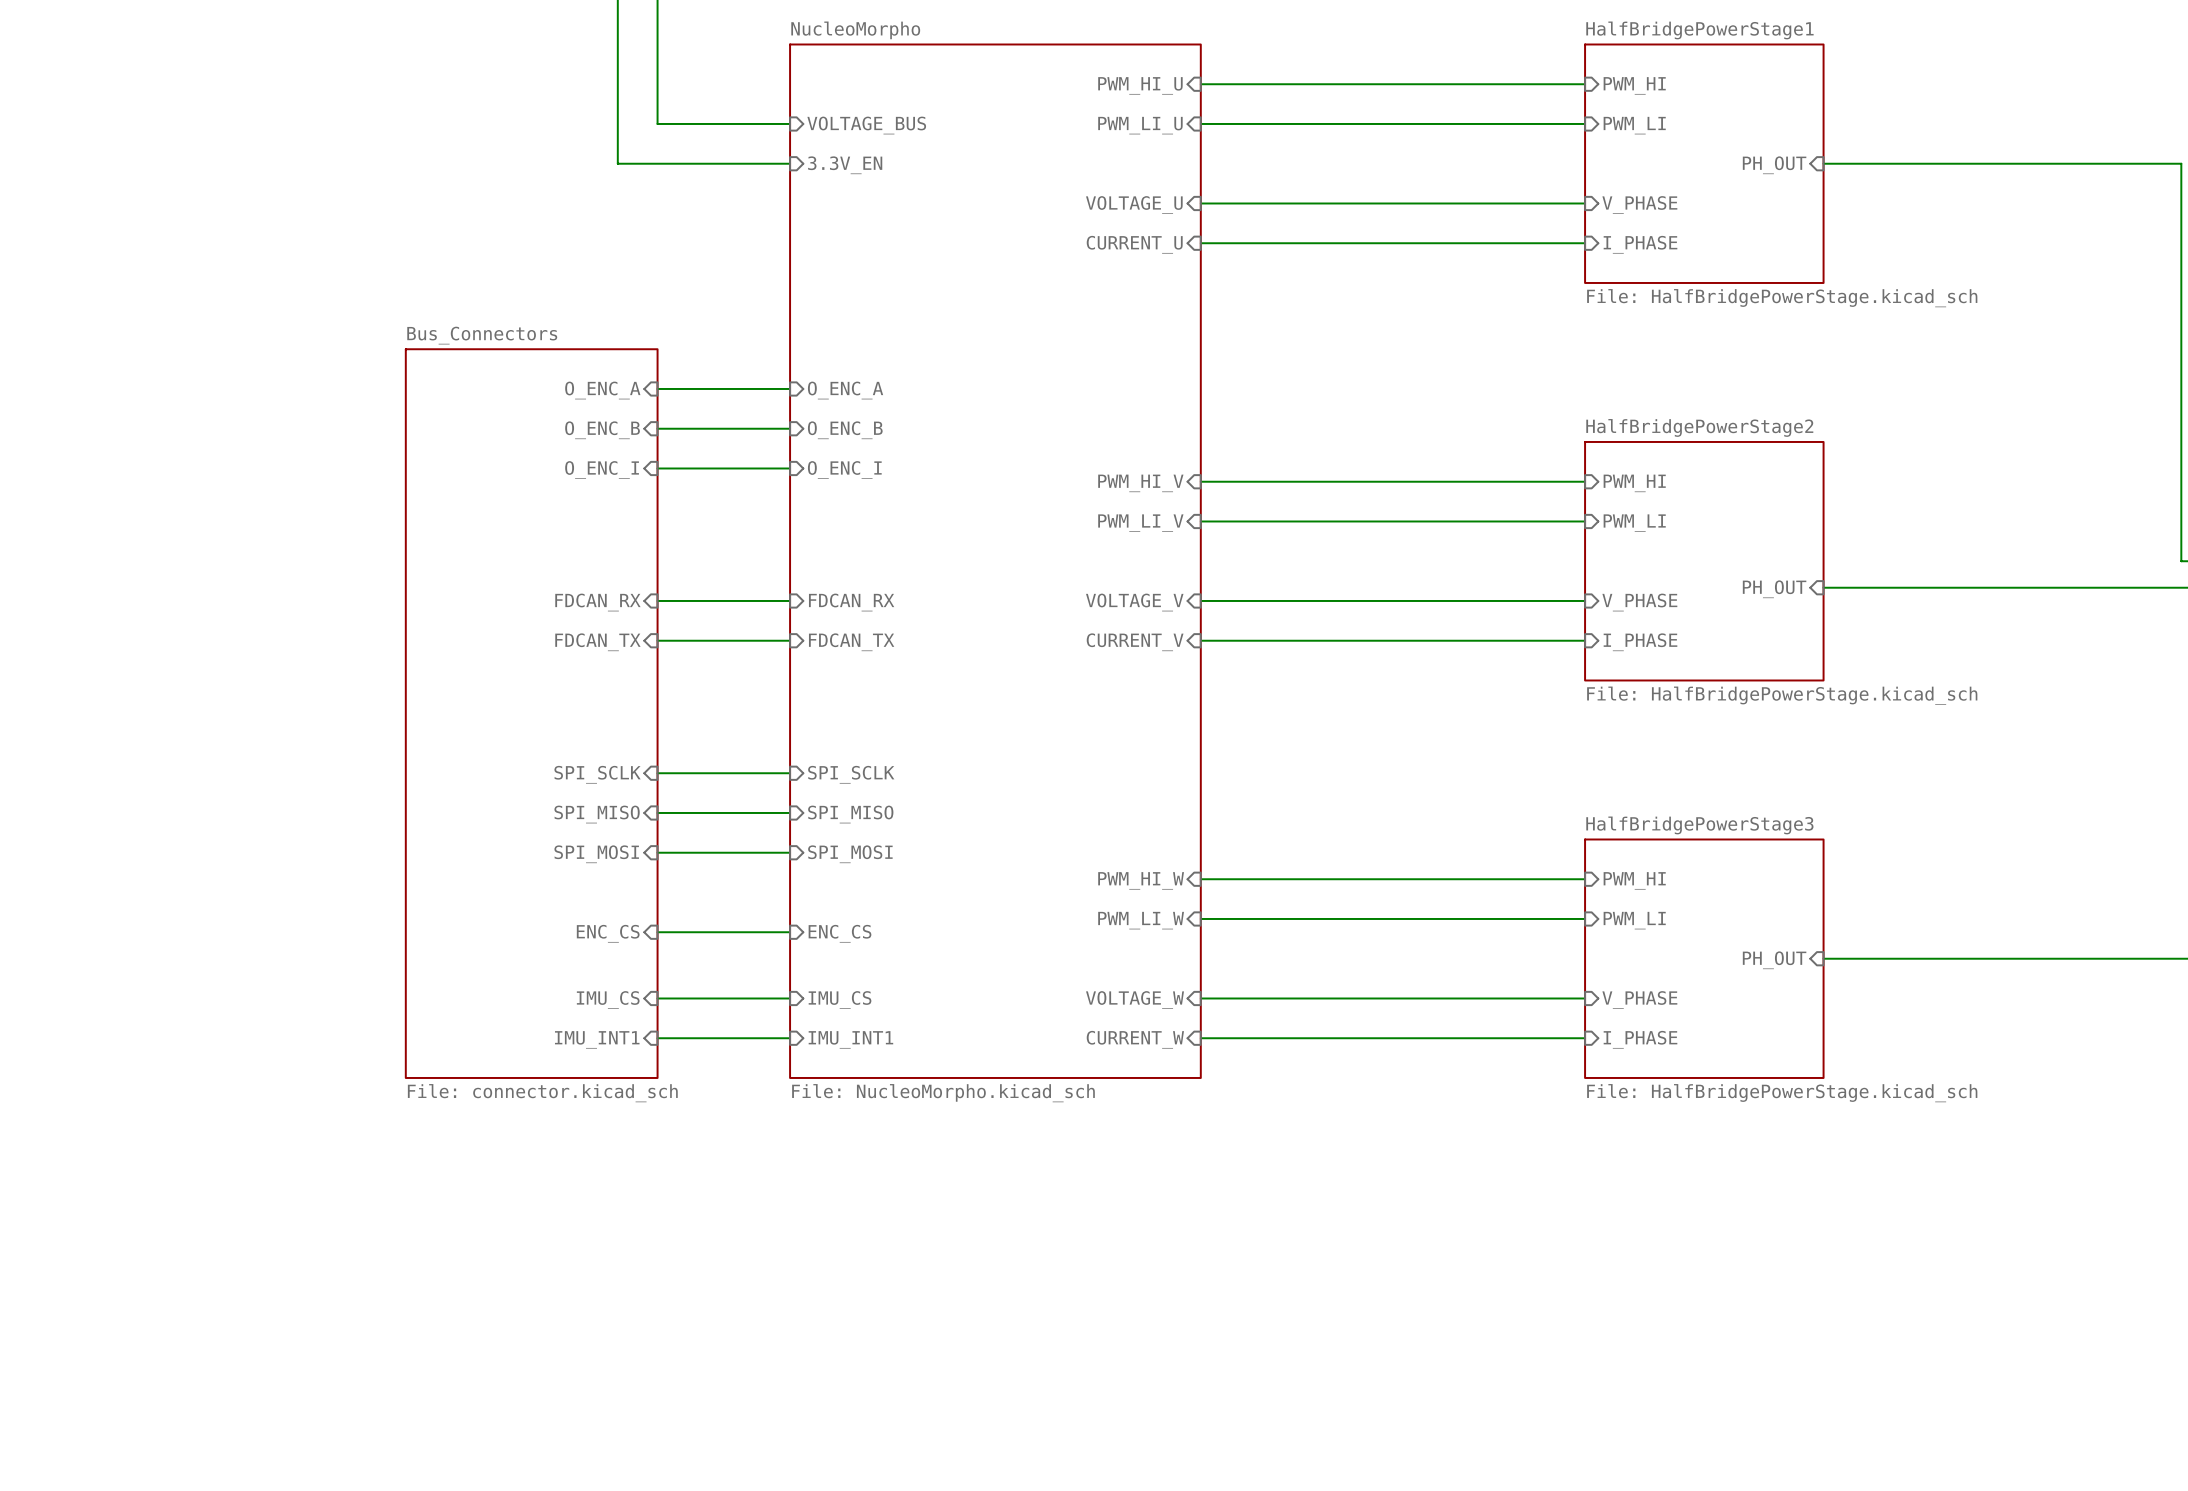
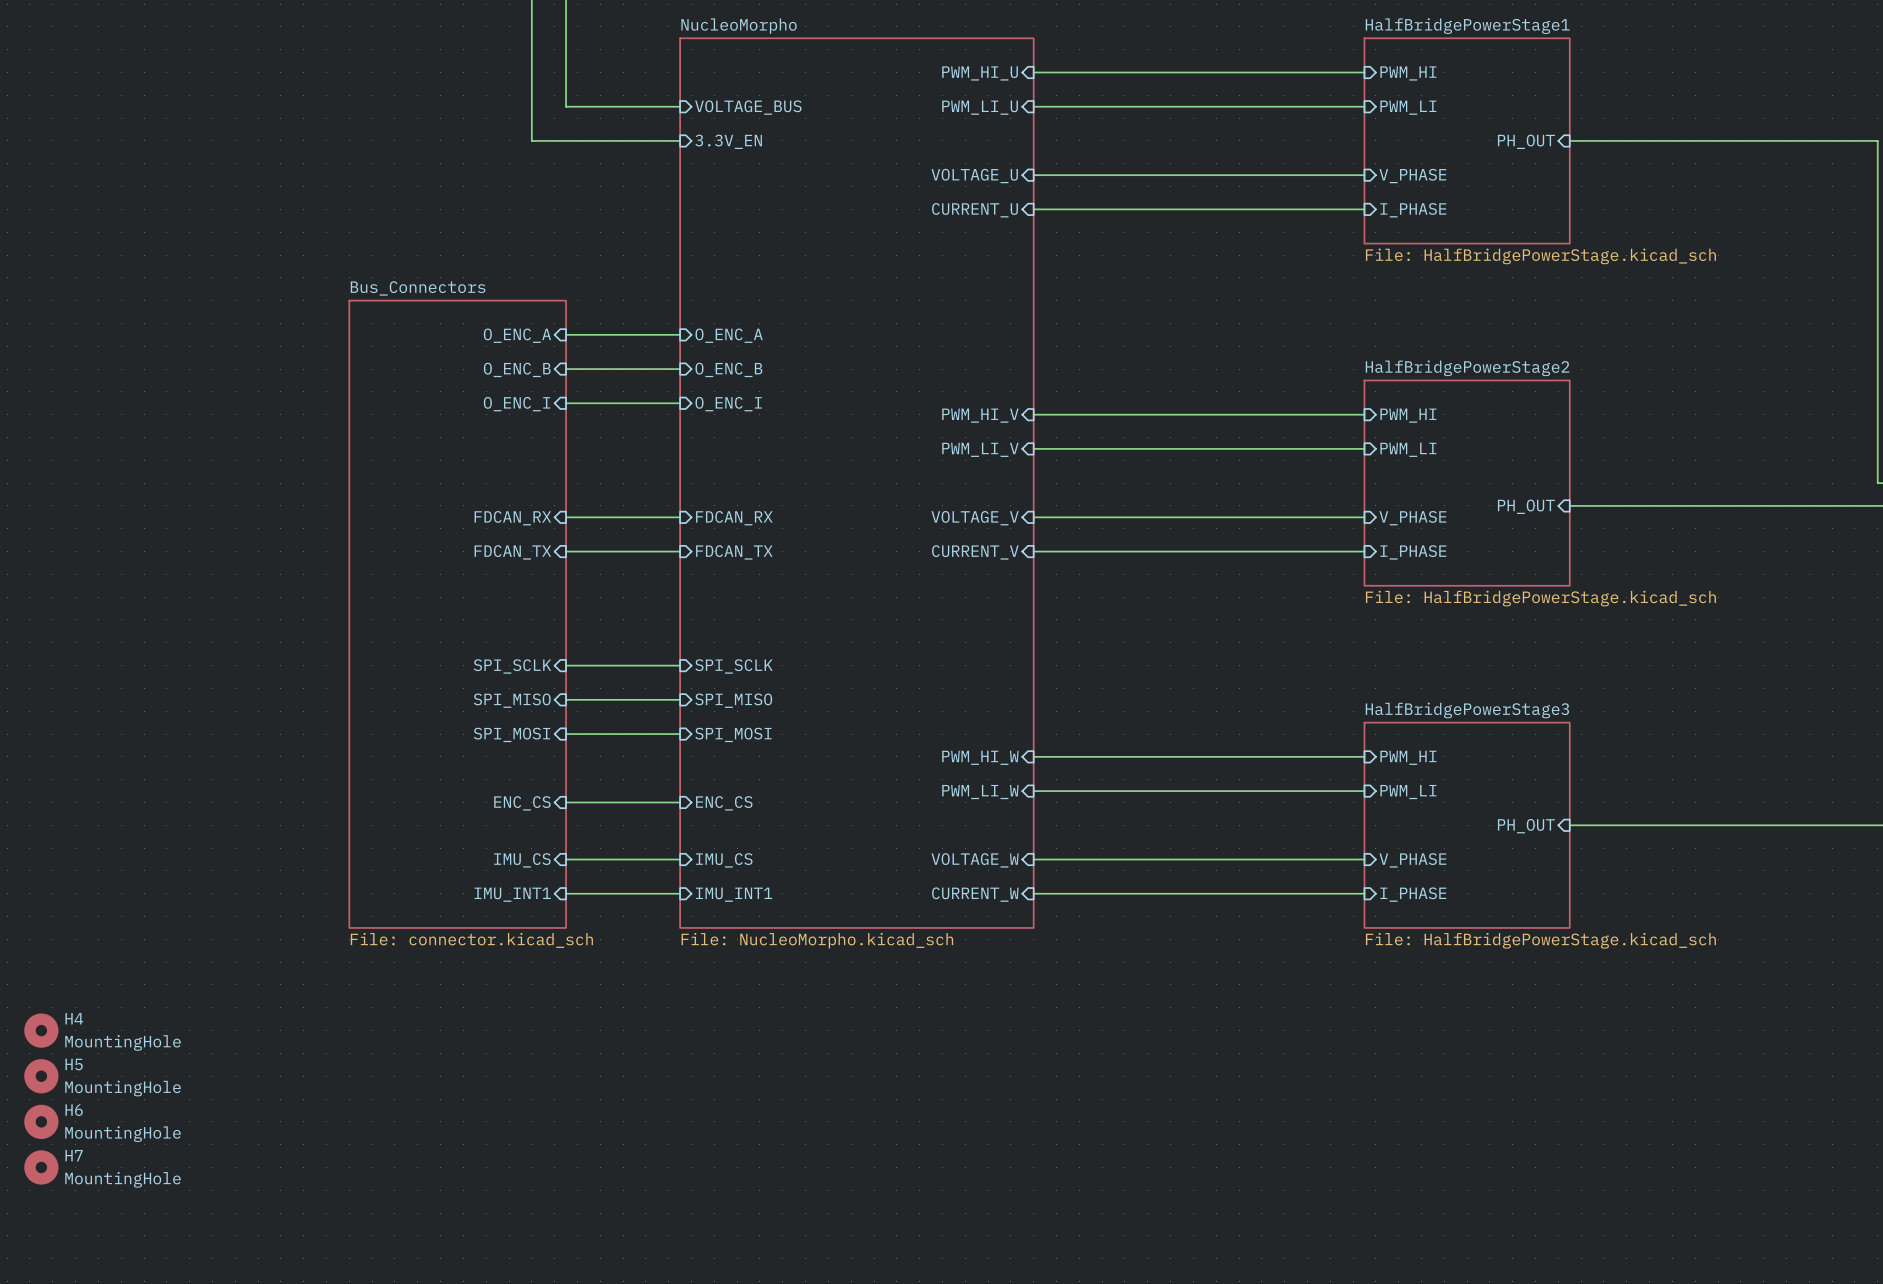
H4: none -> MountingHole (41, 1030)
H5: none -> MountingHole (41, 1076)
H6: none -> MountingHole (41, 1121)
H7: none -> MountingHole (41, 1167)

